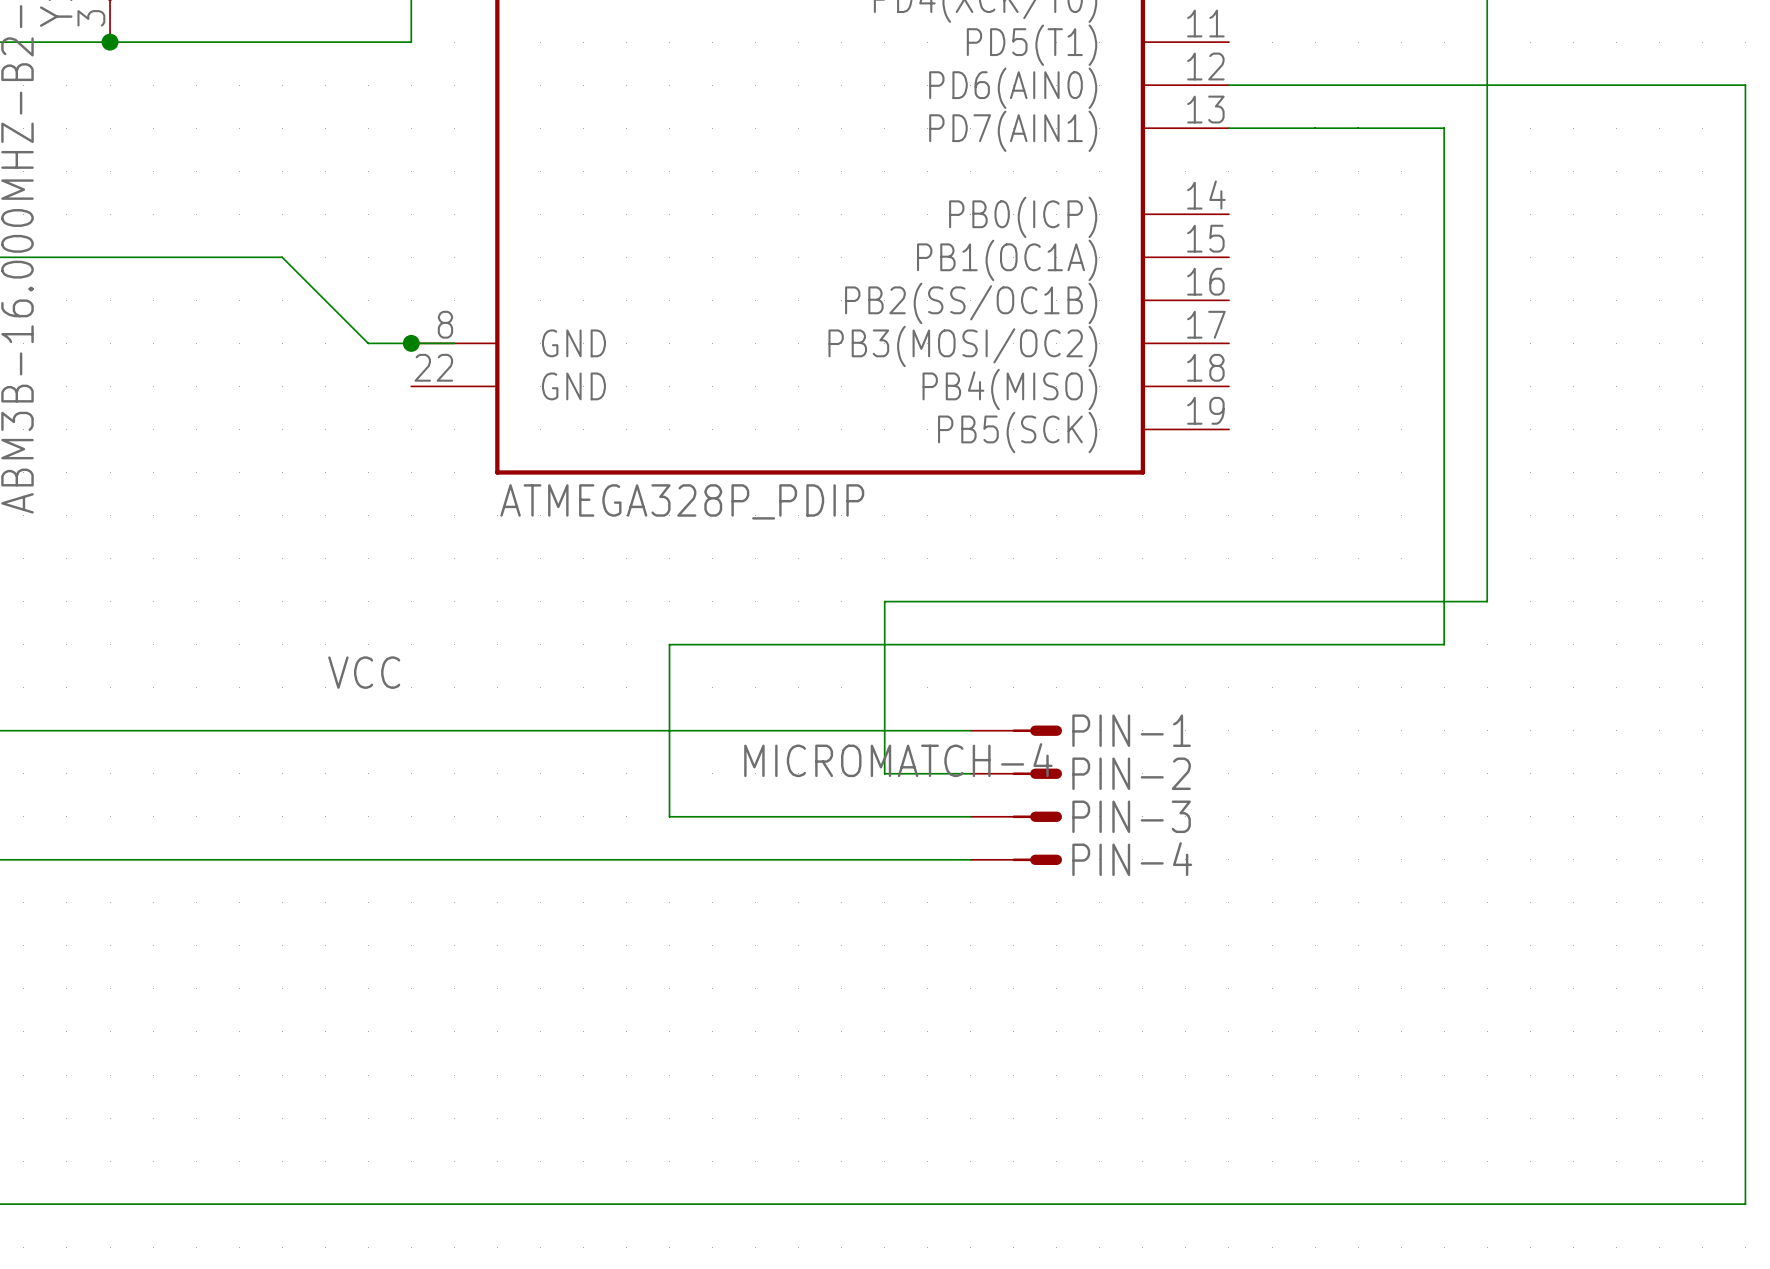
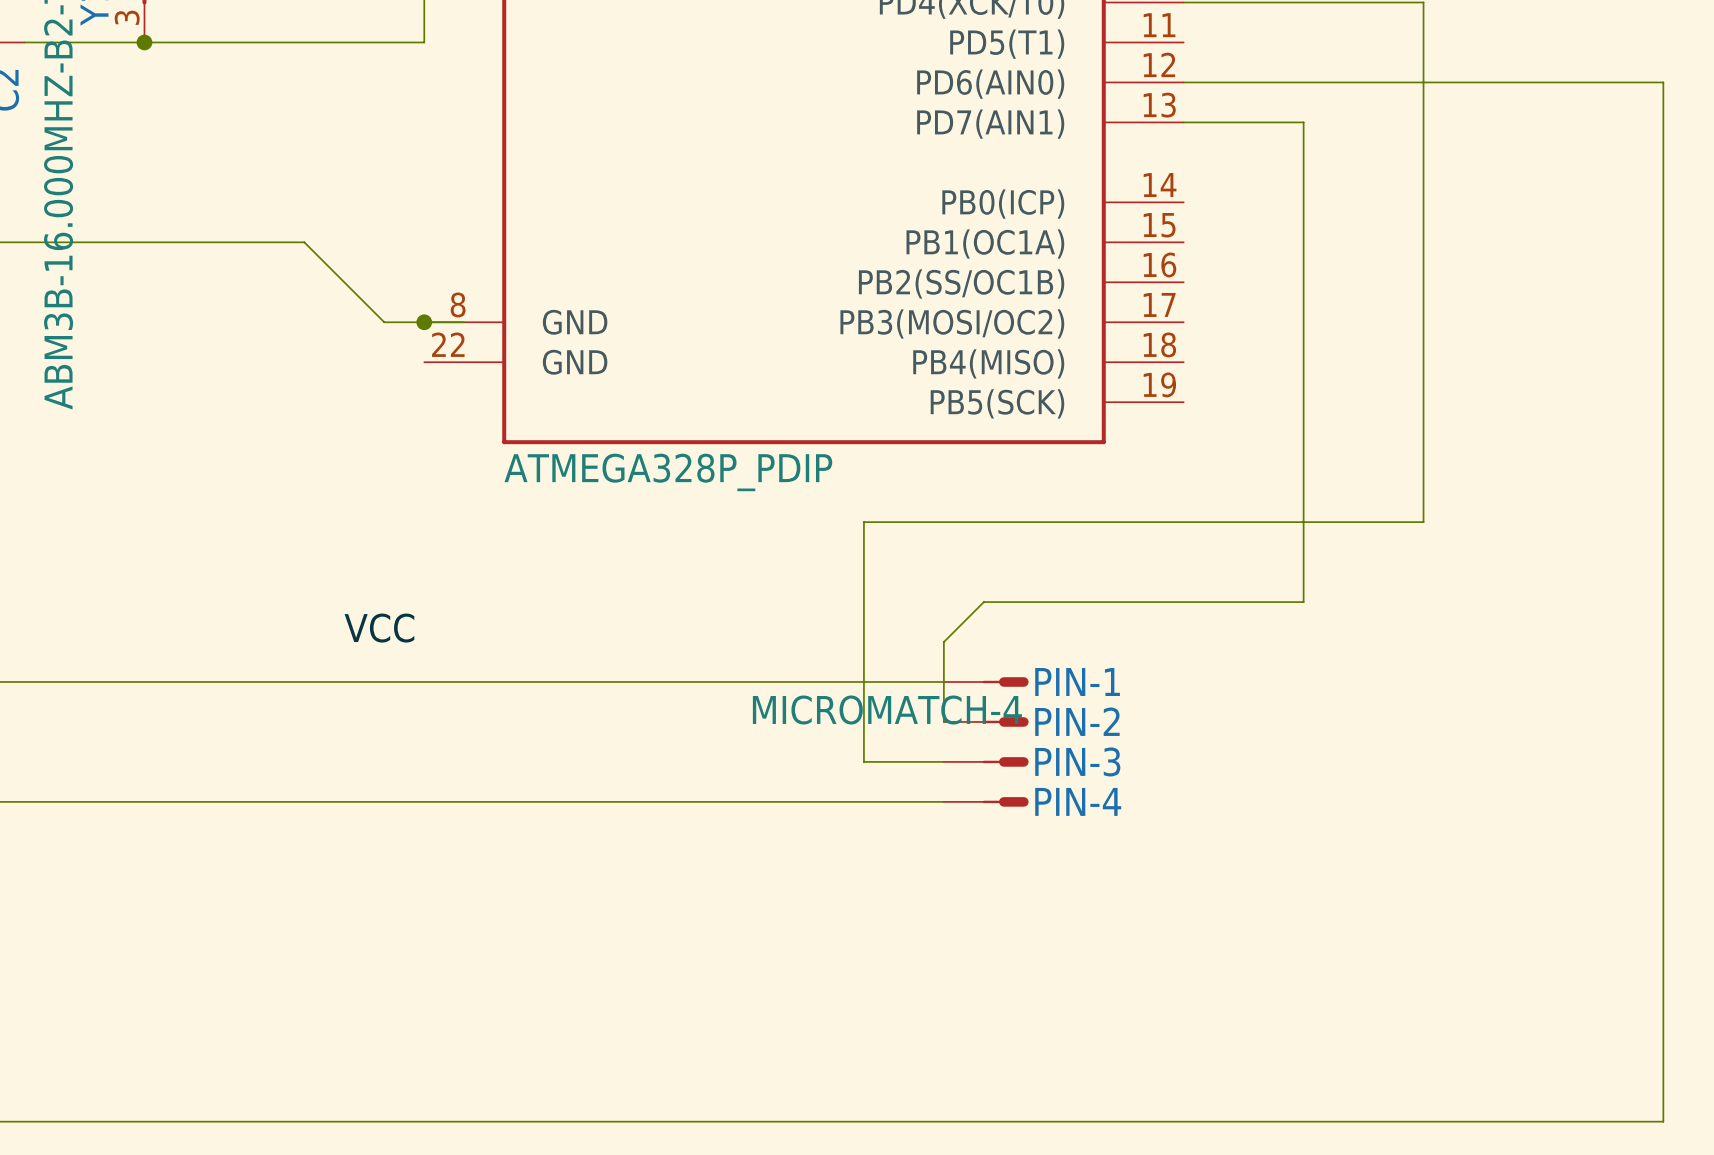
wire: (1358, 128) (1444, 128) (1444, 644) (1358, 644) -> (1303, 122) (1303, 602)
wire: (1487, 558) (1487, 601) (884, 601) -> (1423, 522) (863, 522) (863, 562)
wire: (1013, 644) (669, 644) (669, 816) (884, 816) -> (983, 602) (943, 642) (943, 721)
wire: (884, 773) (970, 773) -> (863, 721) (863, 761)

